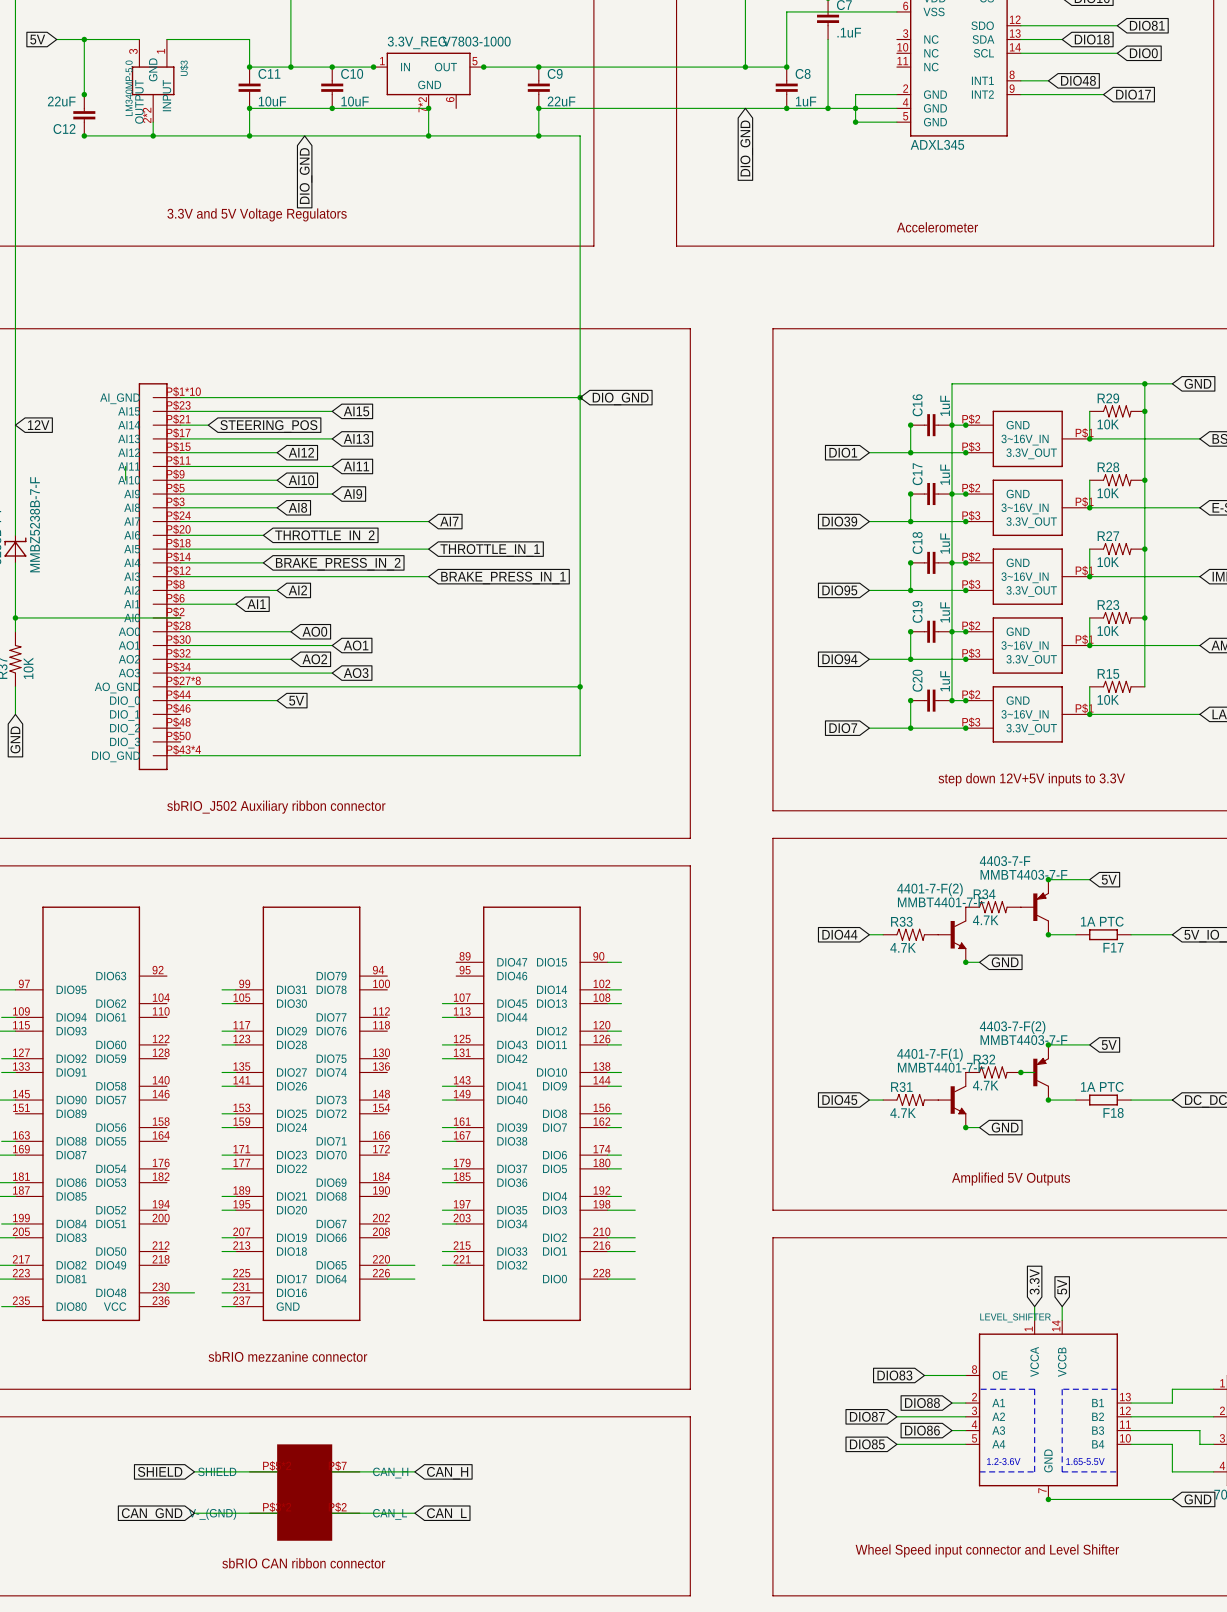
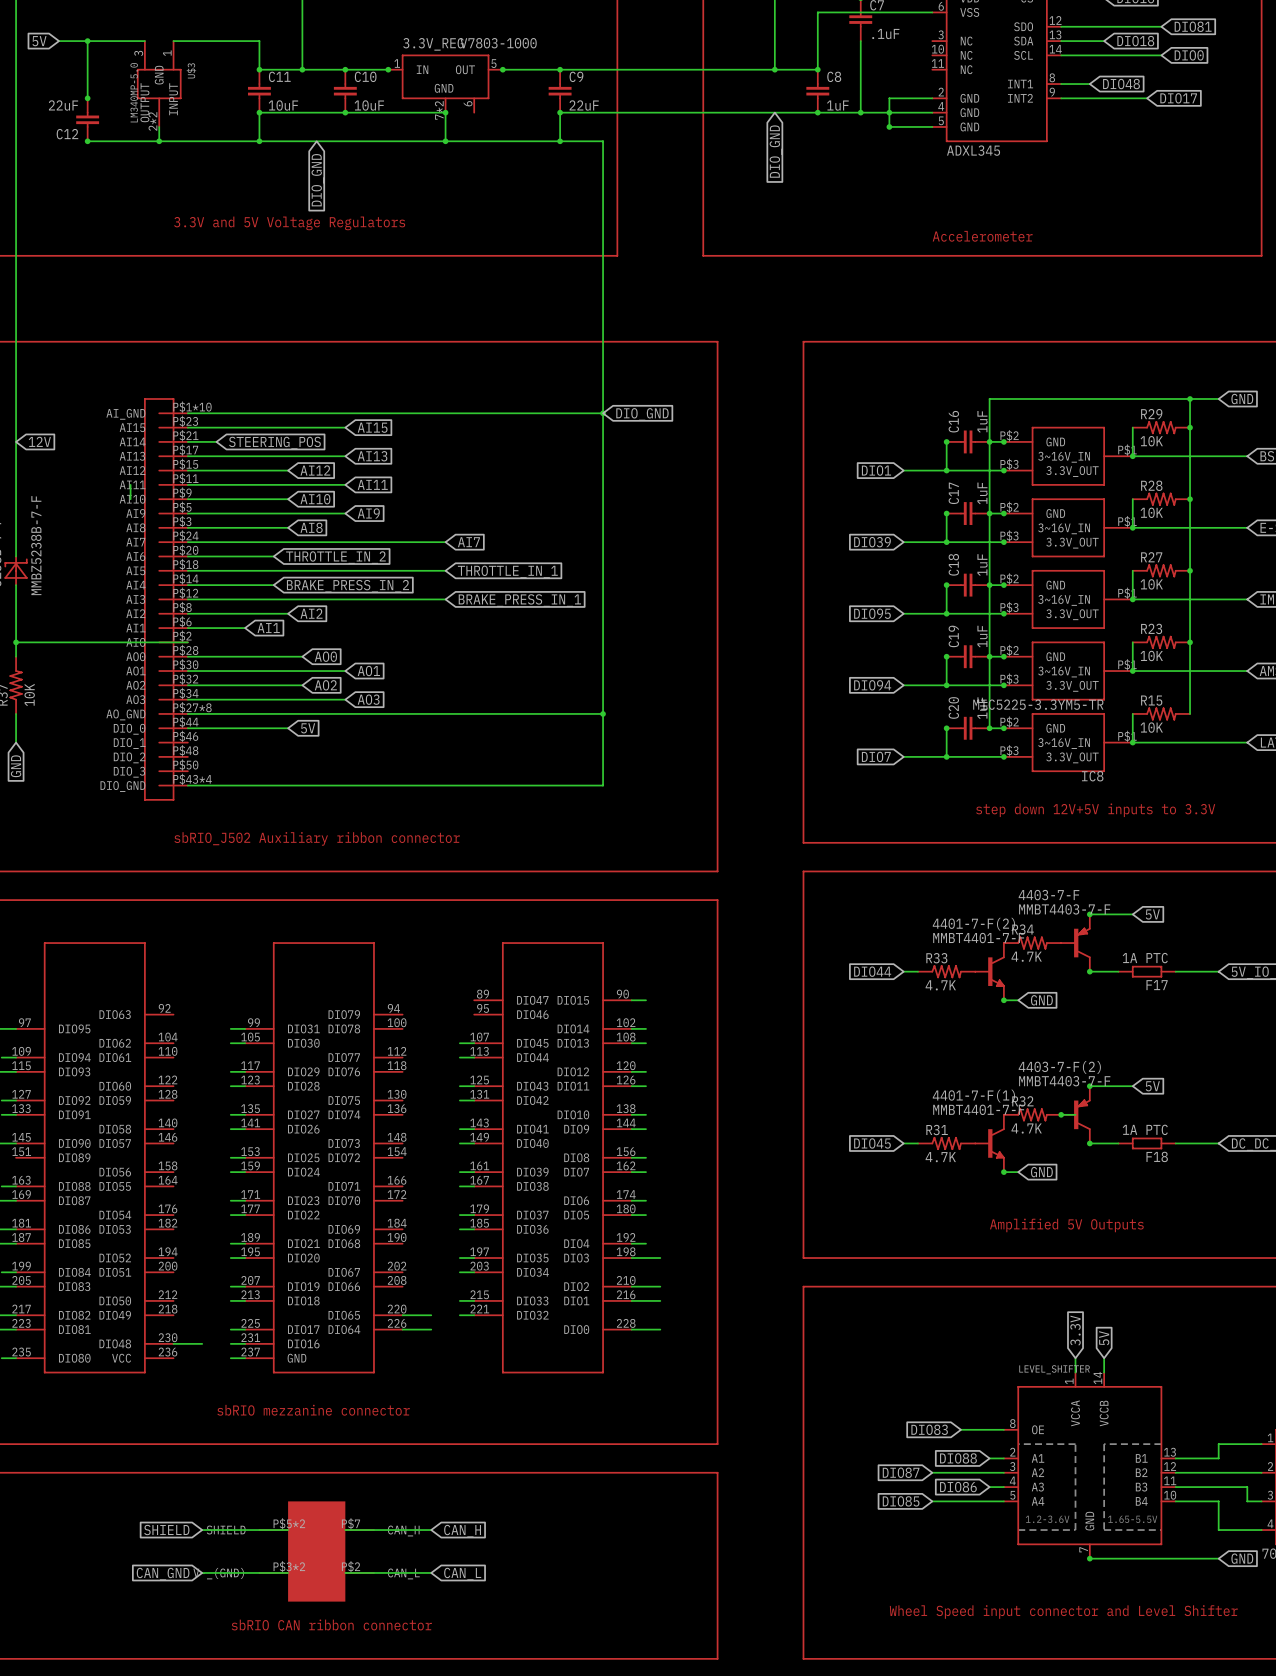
IC8 value: none -> MIC5225-3.3YM5-TR (1038, 704)
IC8 name: none -> IC8 (1092, 776)

